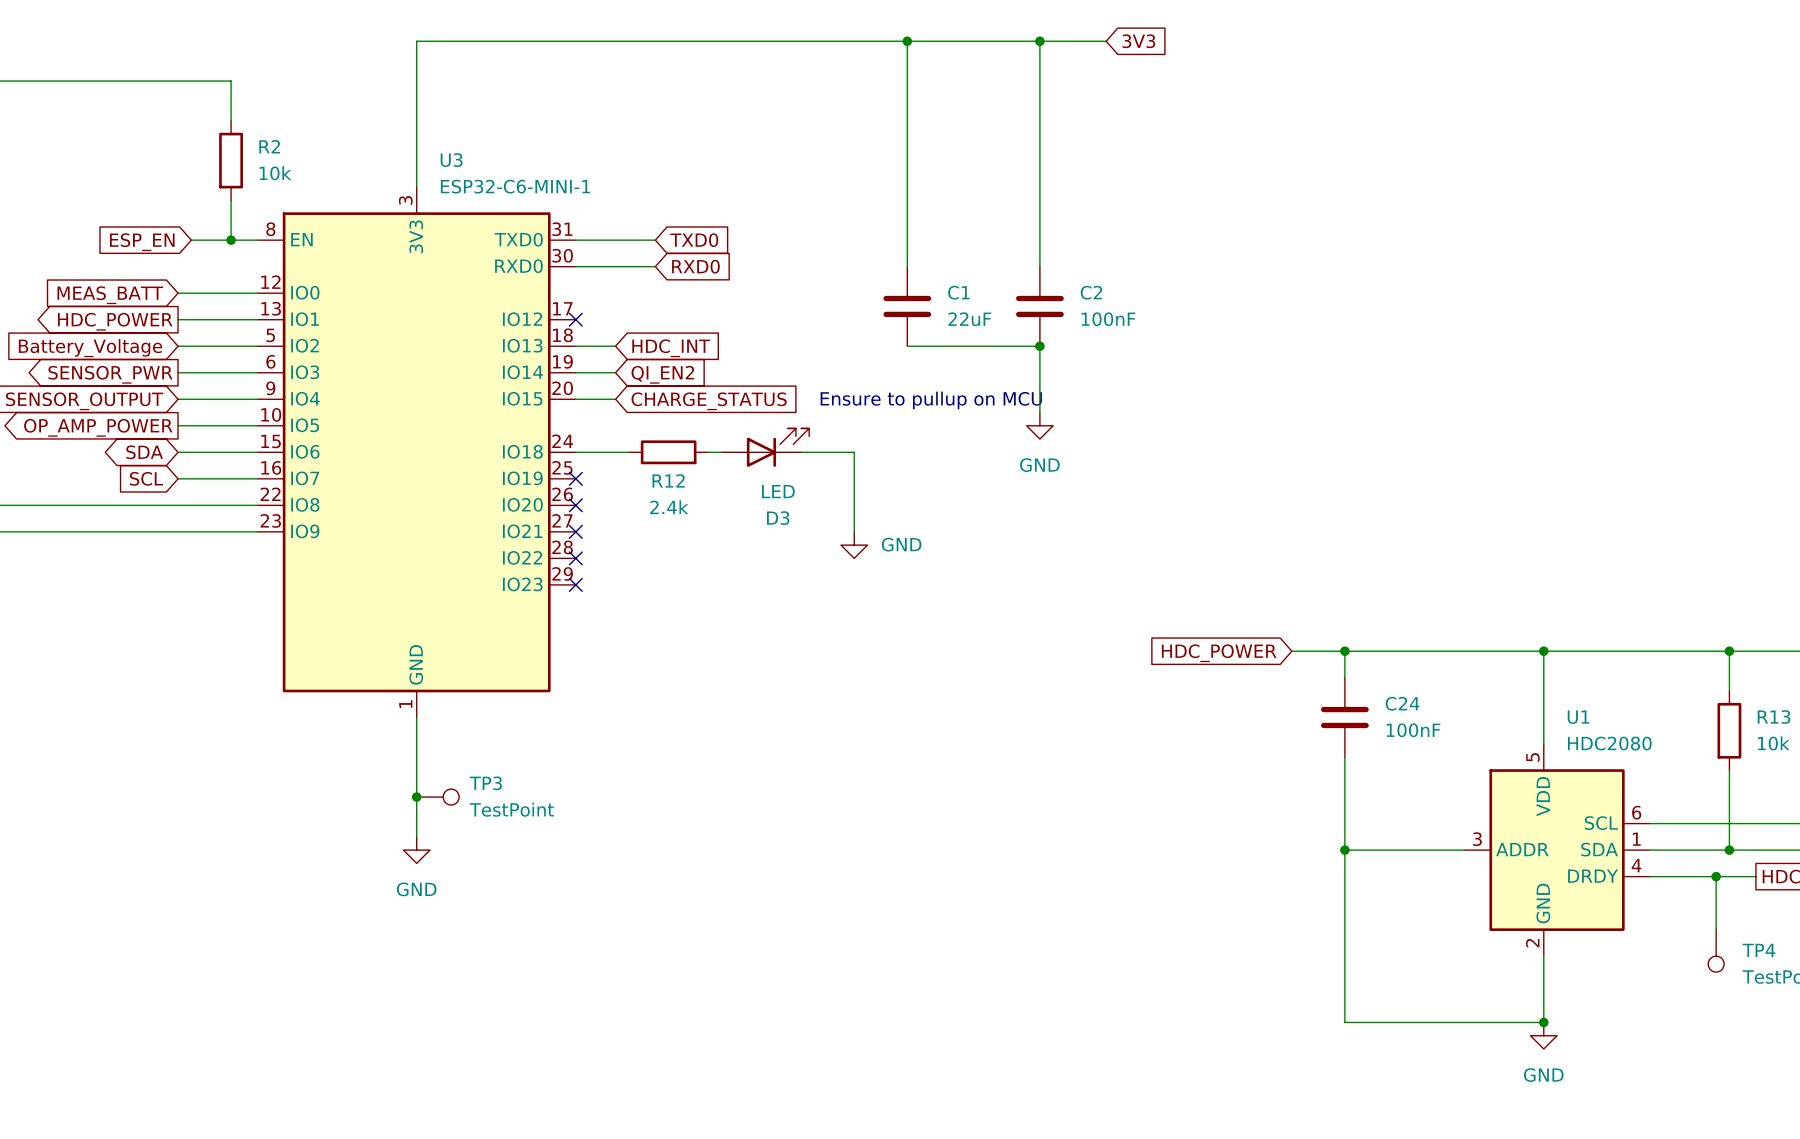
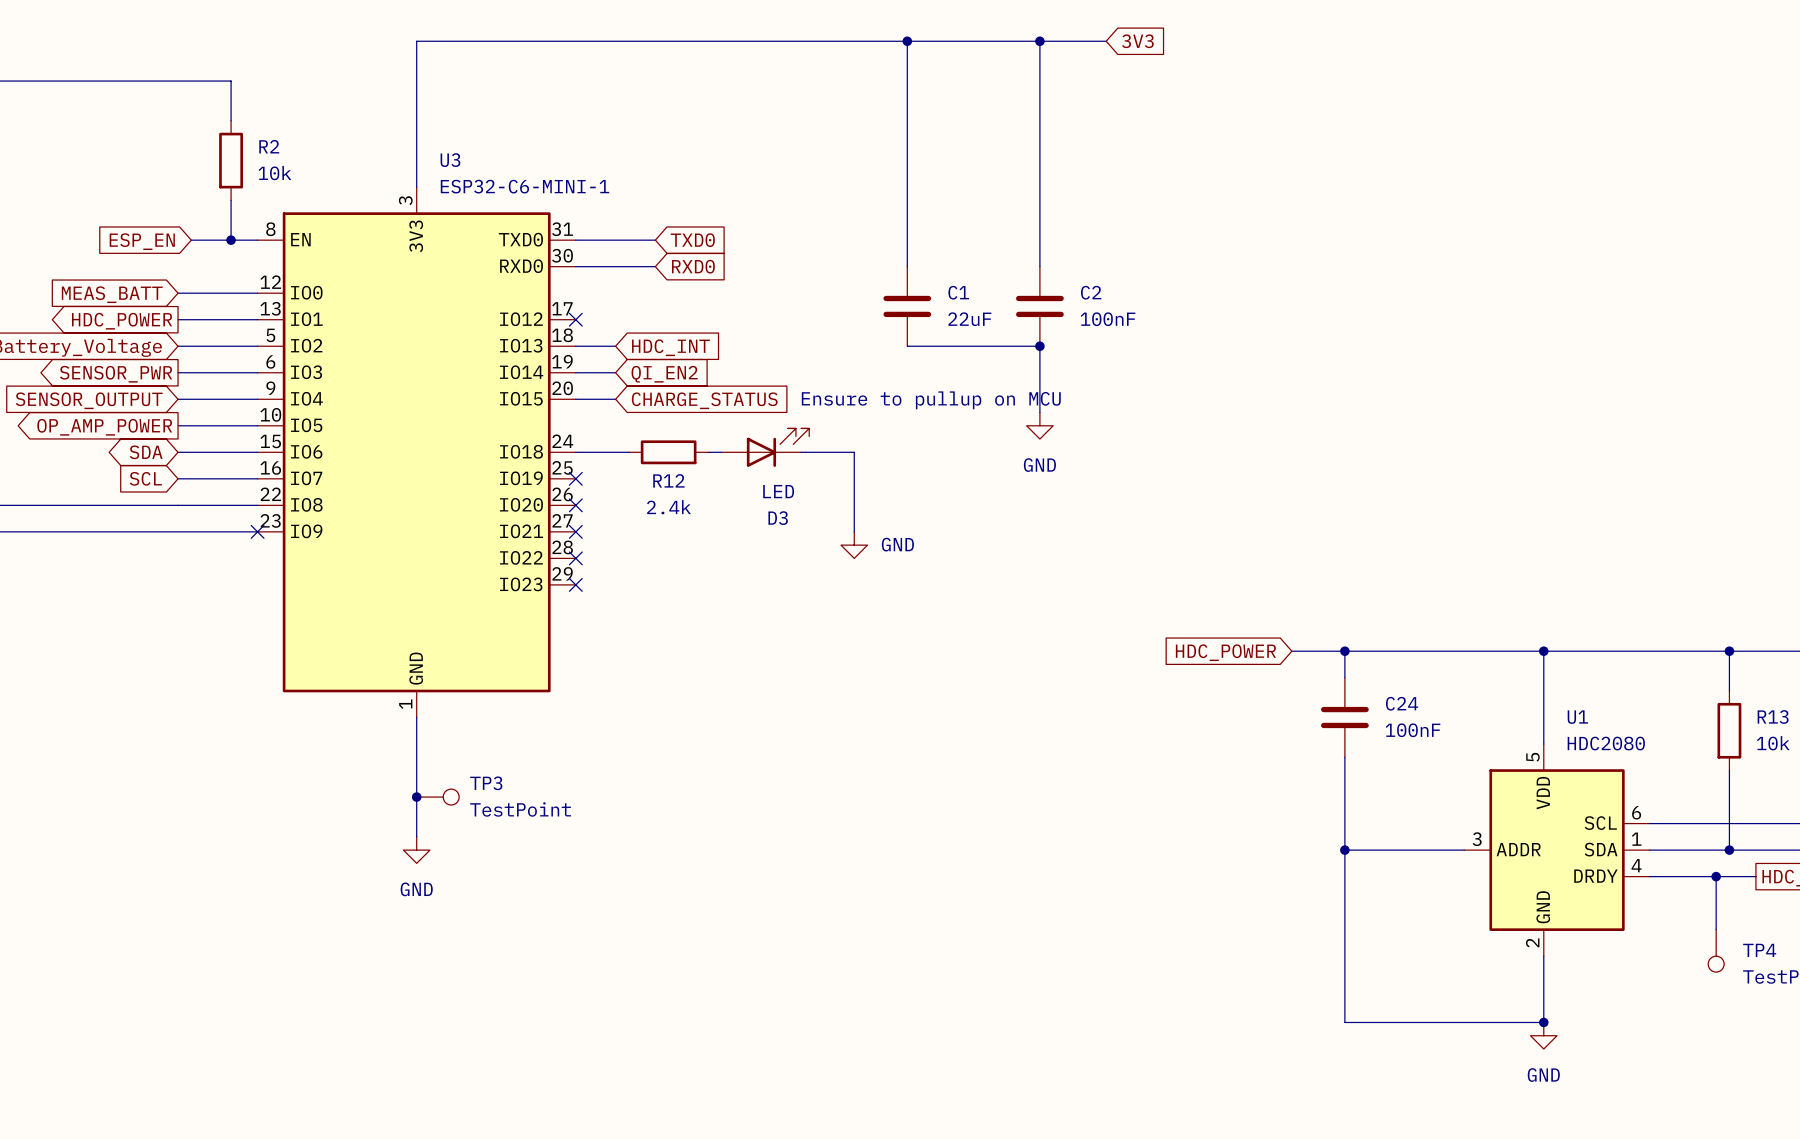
no-connect mark: none -> (257, 531)

